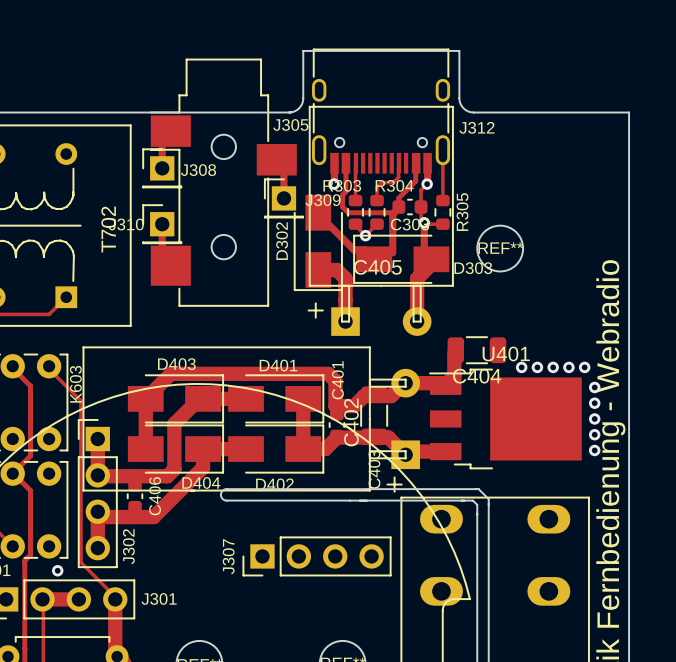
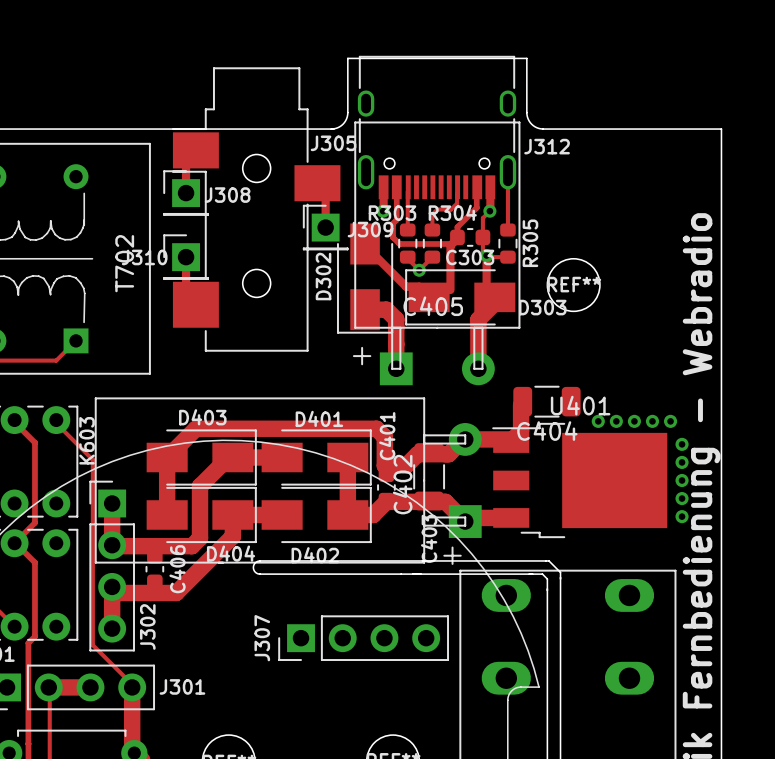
via: (57, 570) -> none

